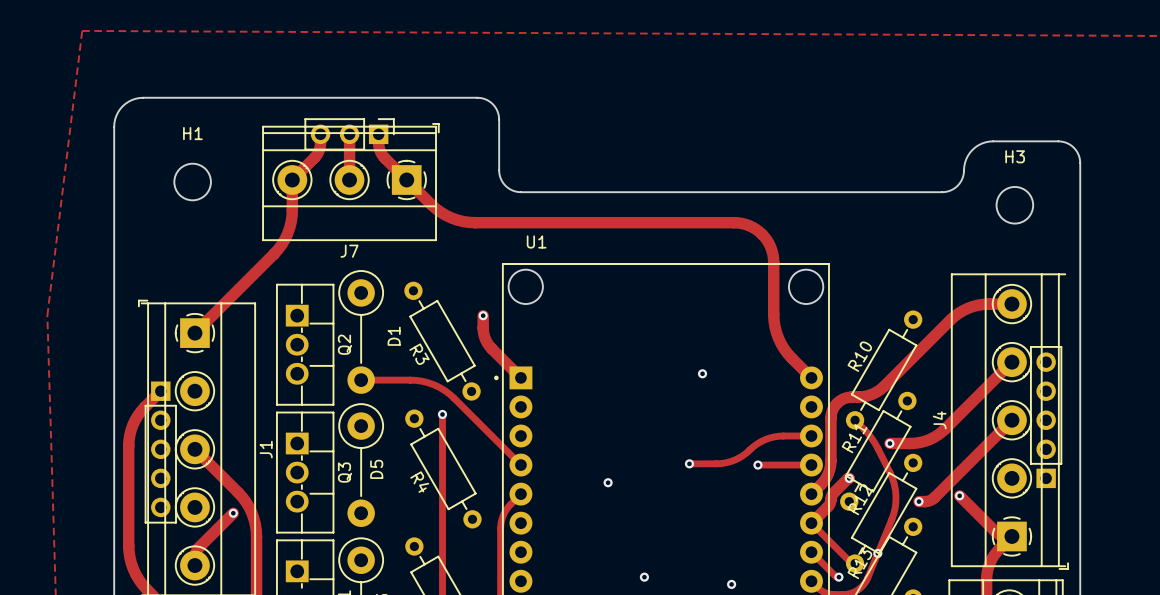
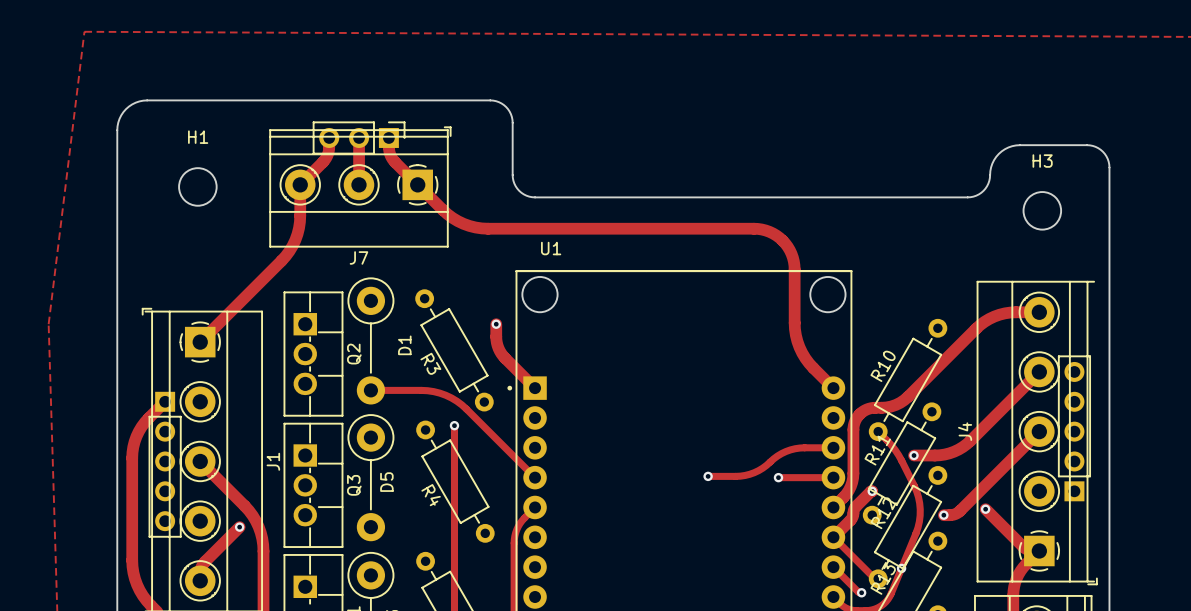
via: (702, 373) -> none
via: (608, 482) -> none
via: (644, 577) -> none
via: (731, 584) -> none

